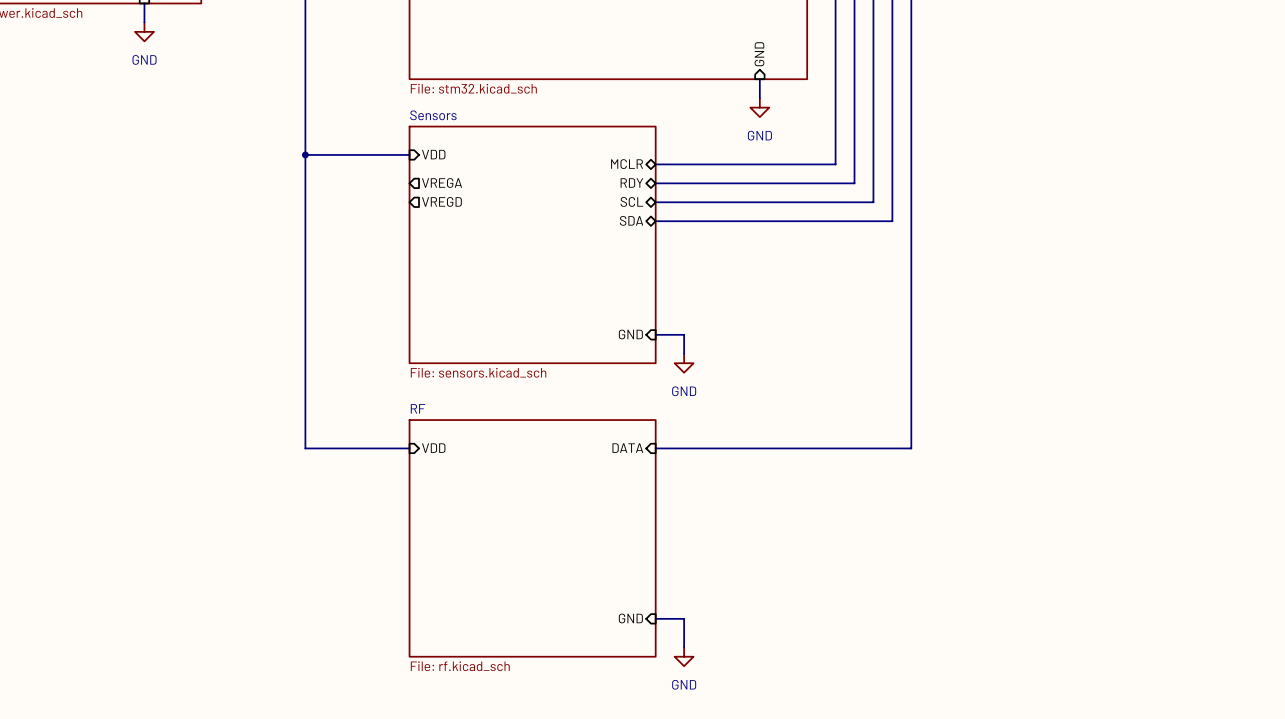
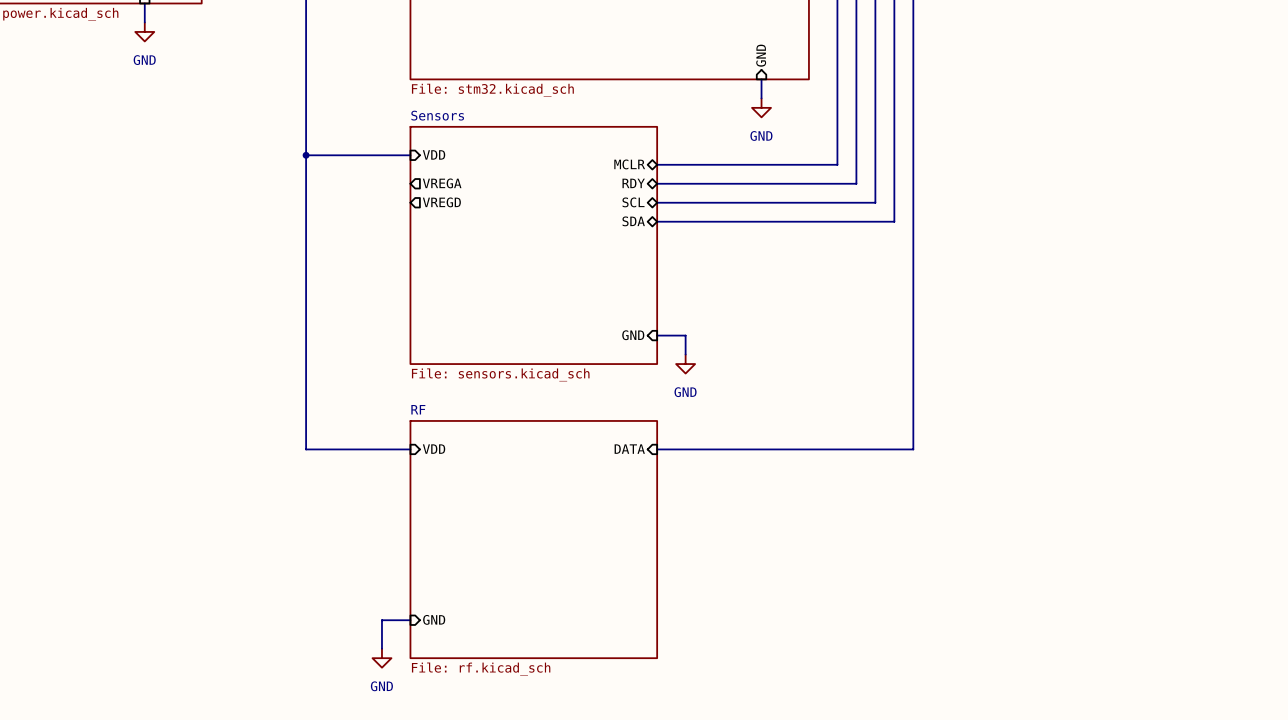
wire: none -> (410, 620) (381, 620) (381, 648)
sheet pin: none -> GND (434, 619)
sheet pin: GND (630, 618) -> none
wire: (655, 618) (684, 618) (684, 647) -> none
power symbol: none -> GND (381, 658)
power symbol: GND (684, 656) -> none

